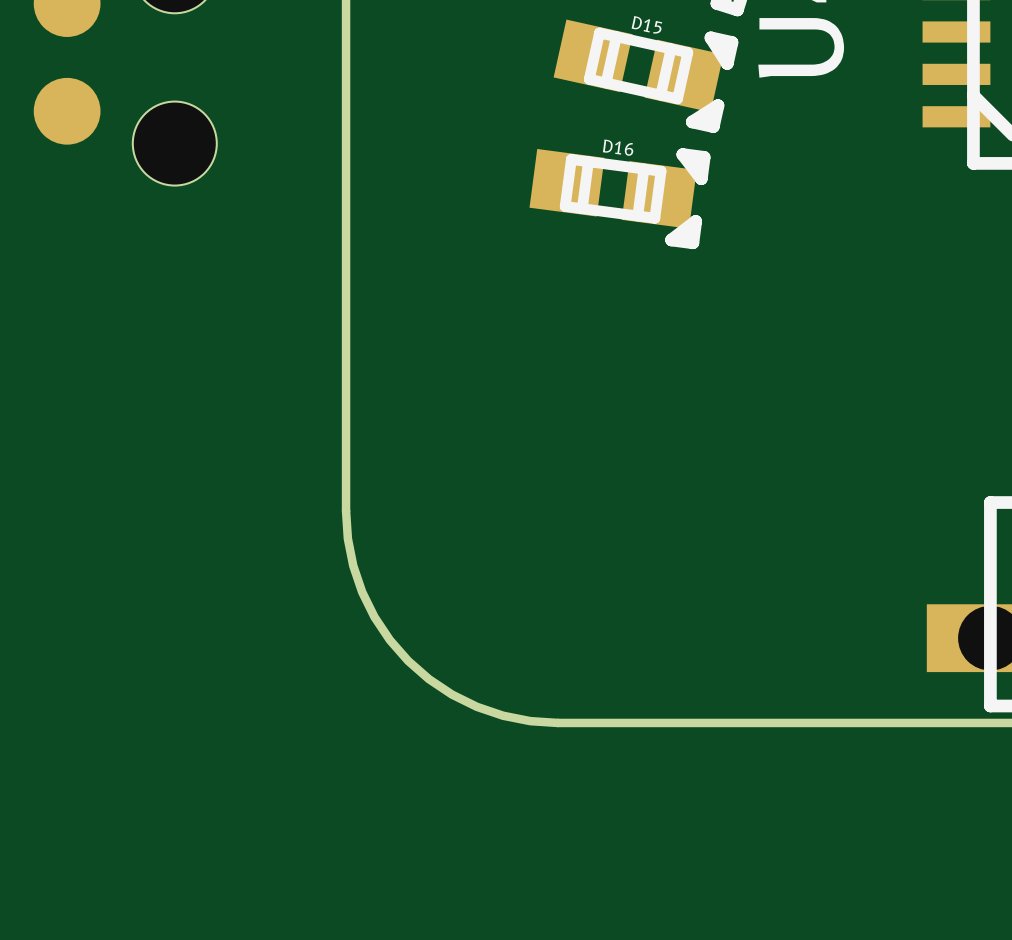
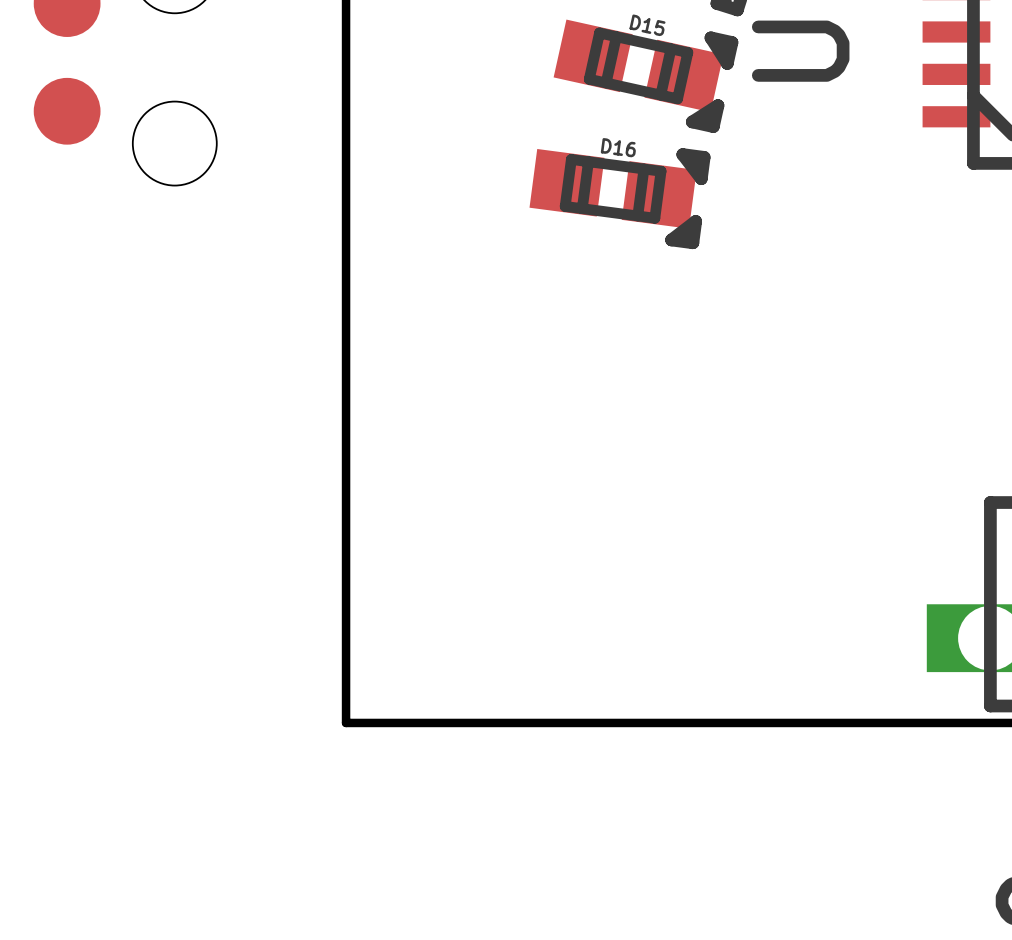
board edge: (346, 511) (347, 538) (353, 565) (362, 592) (374, 616) (389, 640) (408, 660) (428, 679) (452, 694) (476, 706) (503, 715) (530, 721) (558, 722) -> (346, 511) (346, 722) (558, 722)

